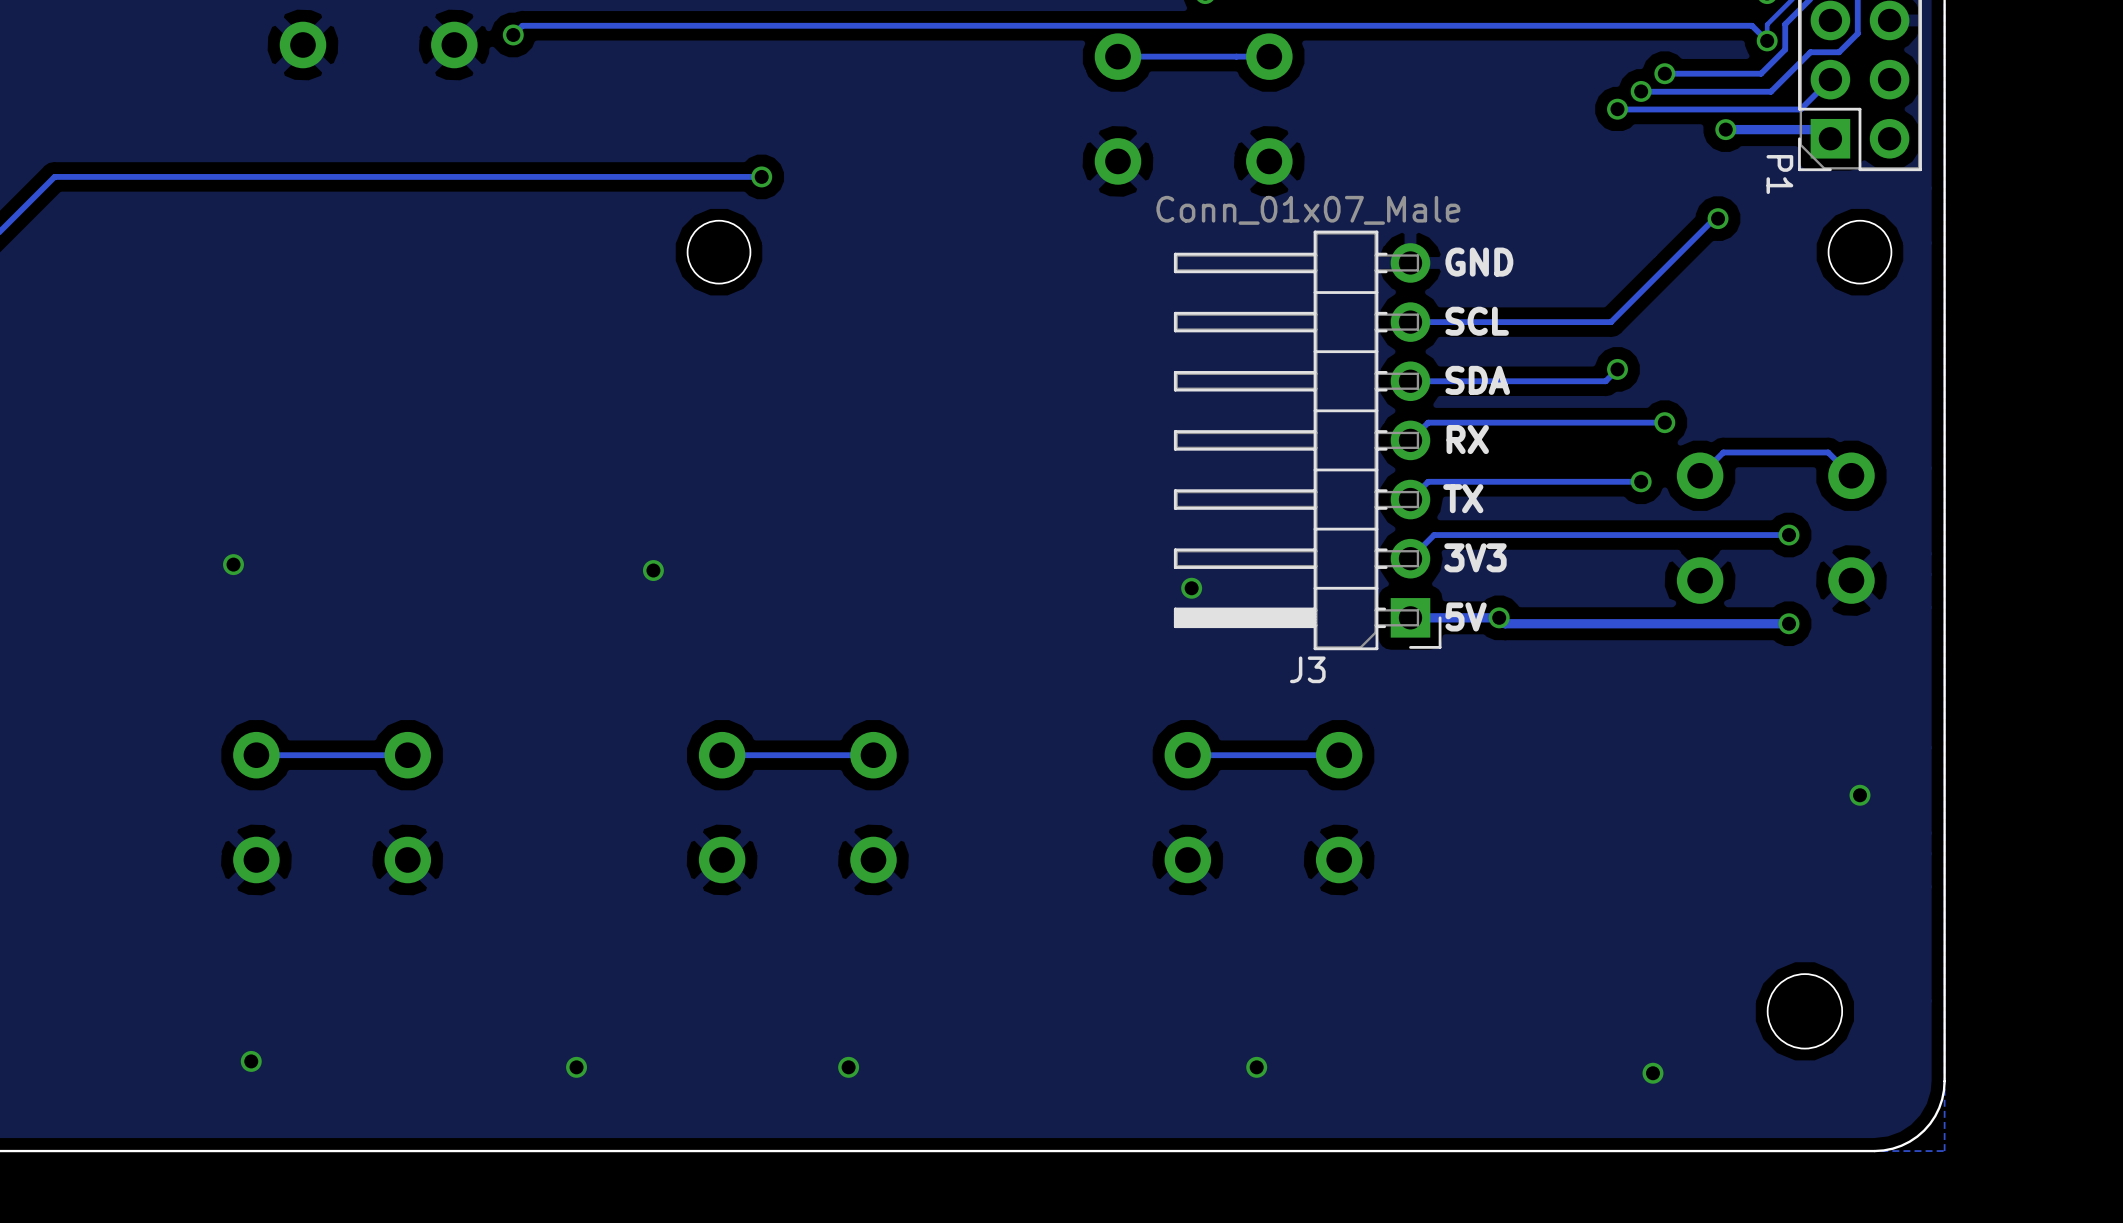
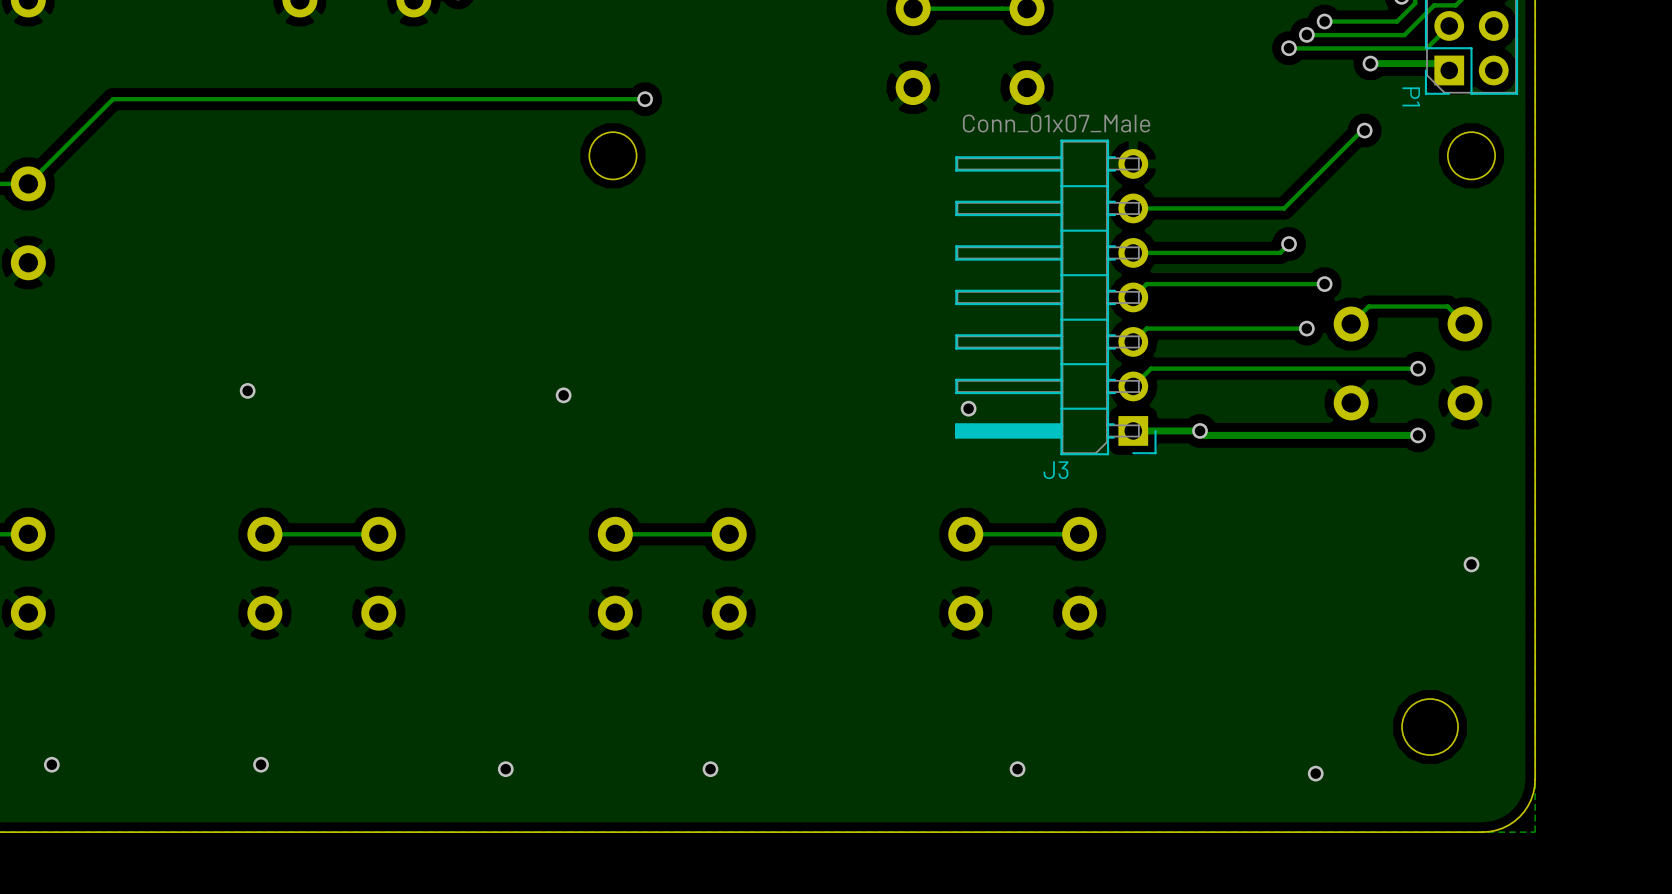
text: GND (1479, 262) -> none
text: SCL (1477, 321) -> none
text: SDA (1477, 380) -> none
text: RX (1467, 439) -> none
text: TX (1463, 498) -> none
text: 3V3 (1475, 557) -> none
text: 5V (1466, 616) -> none

